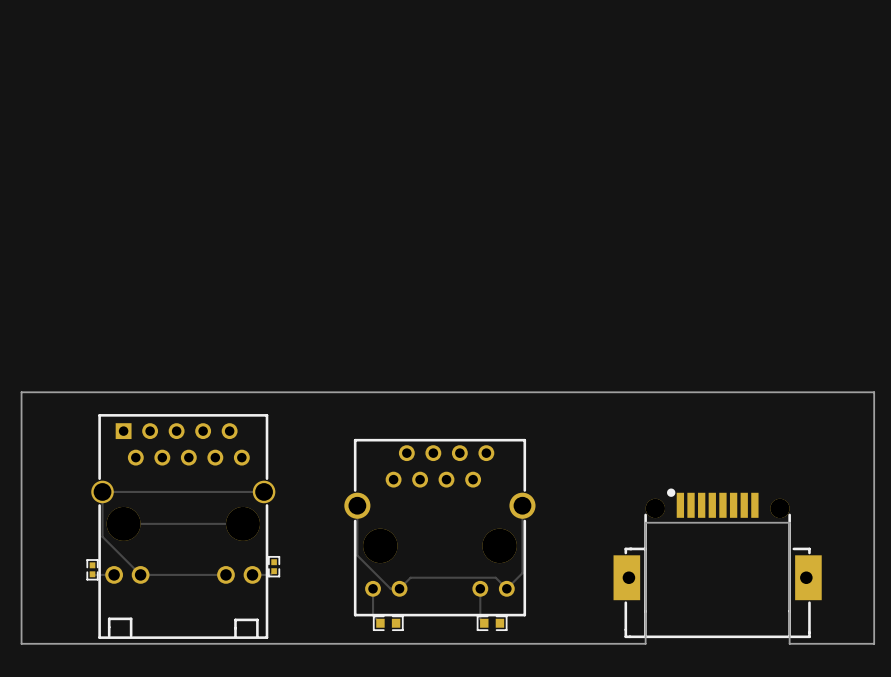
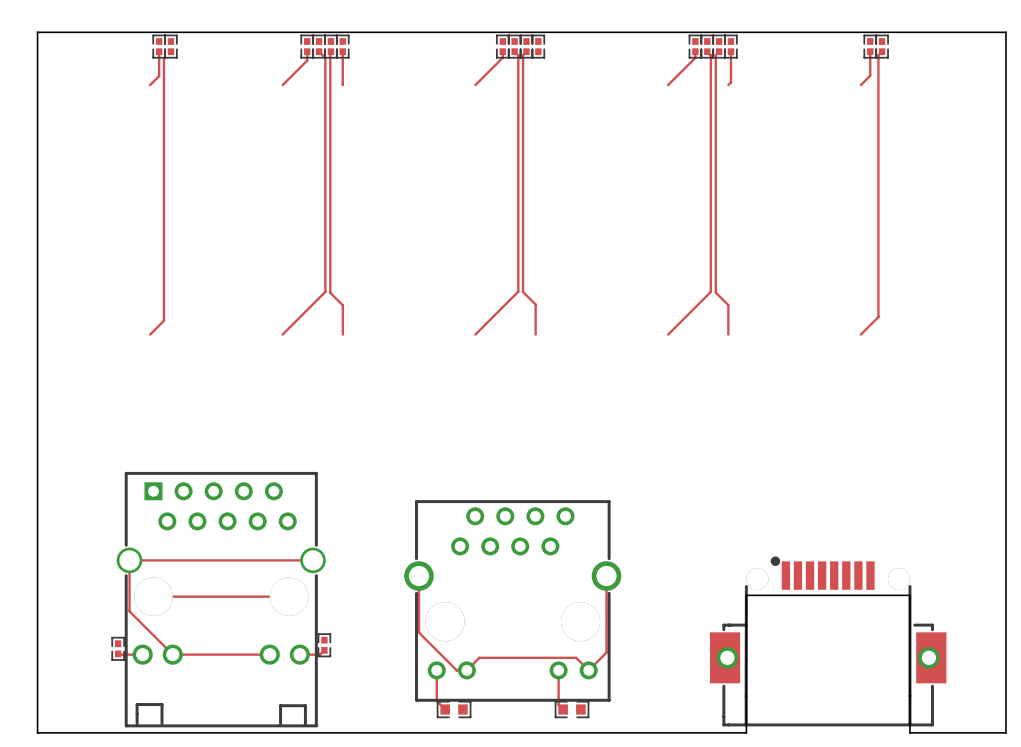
part: none -> (159, 46)
part: none -> (170, 46)
part: none -> (307, 46)
part: none -> (319, 46)
part: none -> (330, 46)
part: none -> (342, 46)
part: none -> (502, 46)
part: none -> (514, 46)
part: none -> (526, 46)
part: none -> (538, 46)
part: none -> (695, 46)
part: none -> (707, 46)
part: none -> (719, 46)
part: none -> (730, 46)
part: none -> (870, 46)
part: none -> (882, 46)
track: none -> (159, 51) (159, 76) (150, 85)
track: none -> (307, 51) (307, 60) (282, 85)
track: none -> (319, 51) (325, 57) (325, 291) (282, 334)
track: none -> (330, 51) (330, 292) (342, 305) (342, 334)
track: none -> (342, 51) (342, 84)
track: none -> (502, 51) (502, 57) (475, 85)
track: none -> (514, 51) (518, 55) (518, 291) (475, 334)
track: none -> (526, 51) (523, 55) (523, 291) (535, 304) (535, 334)
track: none -> (695, 51) (695, 57) (668, 85)
track: none -> (707, 51) (710, 55) (710, 291) (668, 334)
track: none -> (719, 51) (715, 55) (715, 292) (728, 305) (728, 334)
track: none -> (730, 51) (730, 82) (728, 85)
track: none -> (870, 51) (870, 75) (860, 85)
track: none -> (882, 51) (878, 55) (878, 317) (860, 334)
track: none -> (163, 58) (163, 320) (150, 334)
board edge: (21, 392) (874, 392) -> (37, 447) (37, 32) (1005, 32) (1005, 447)

